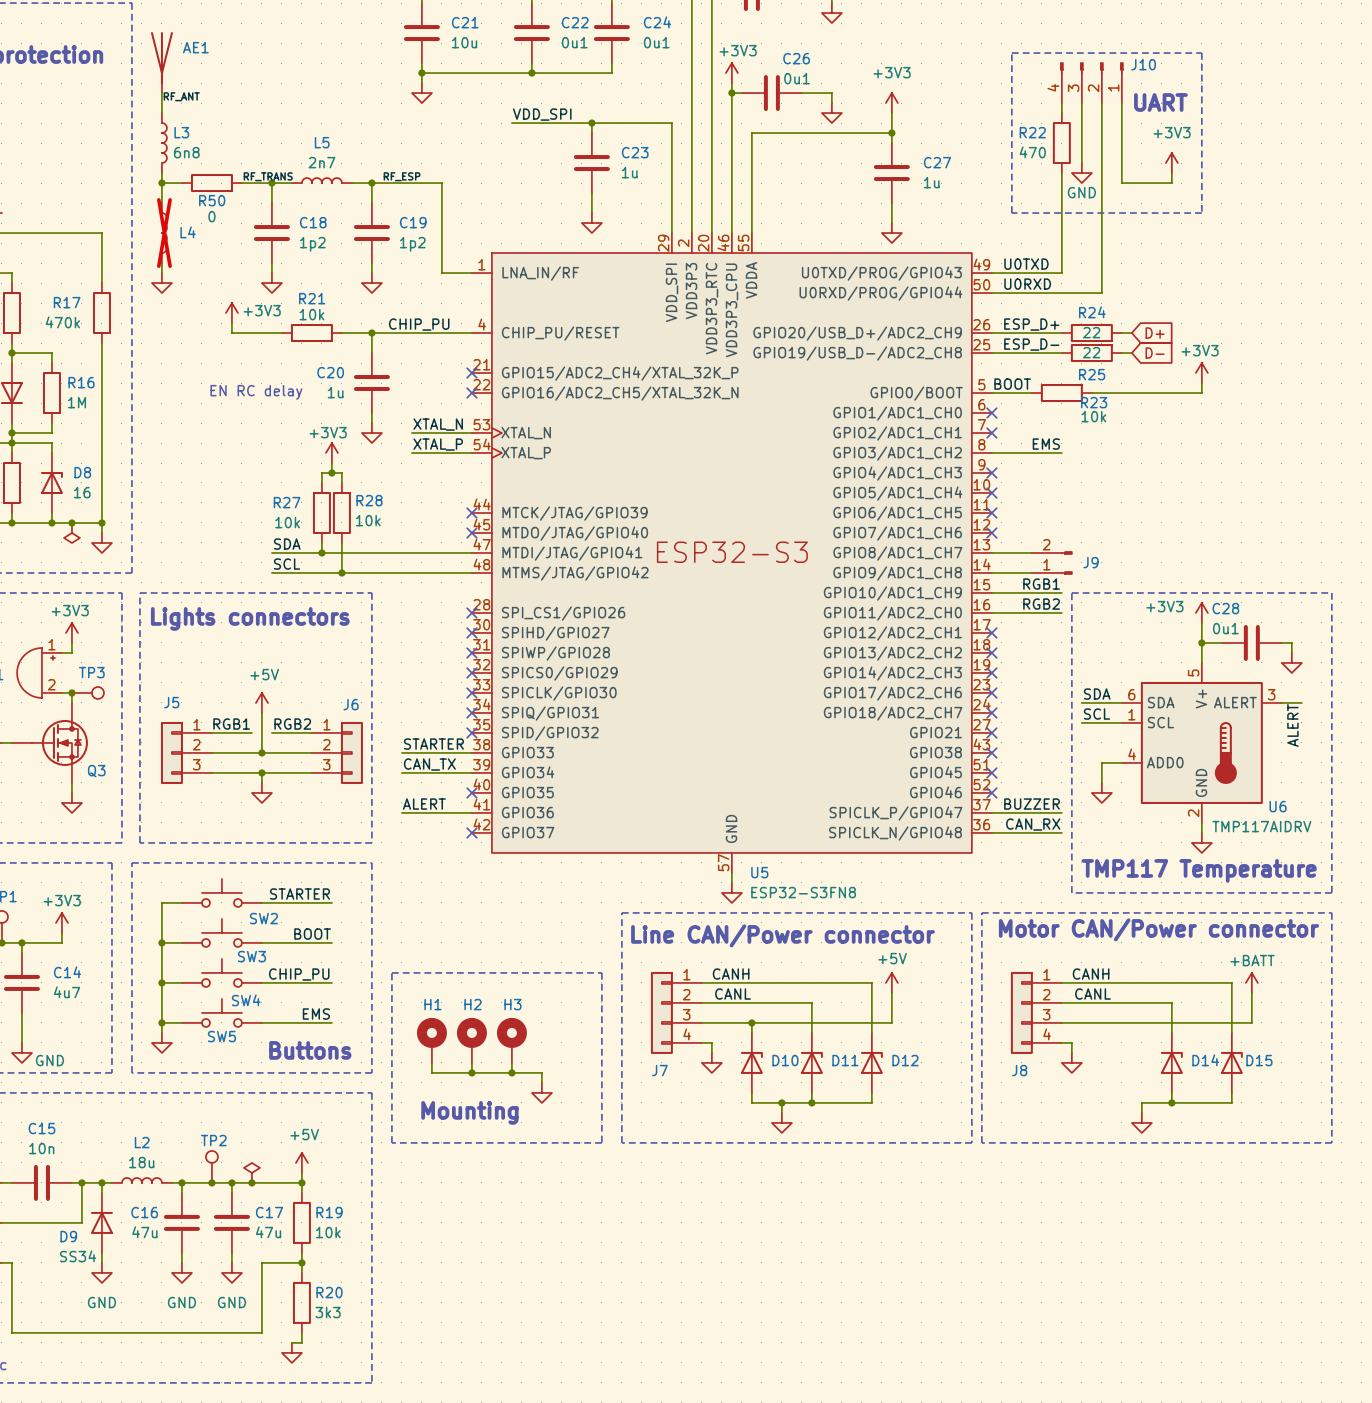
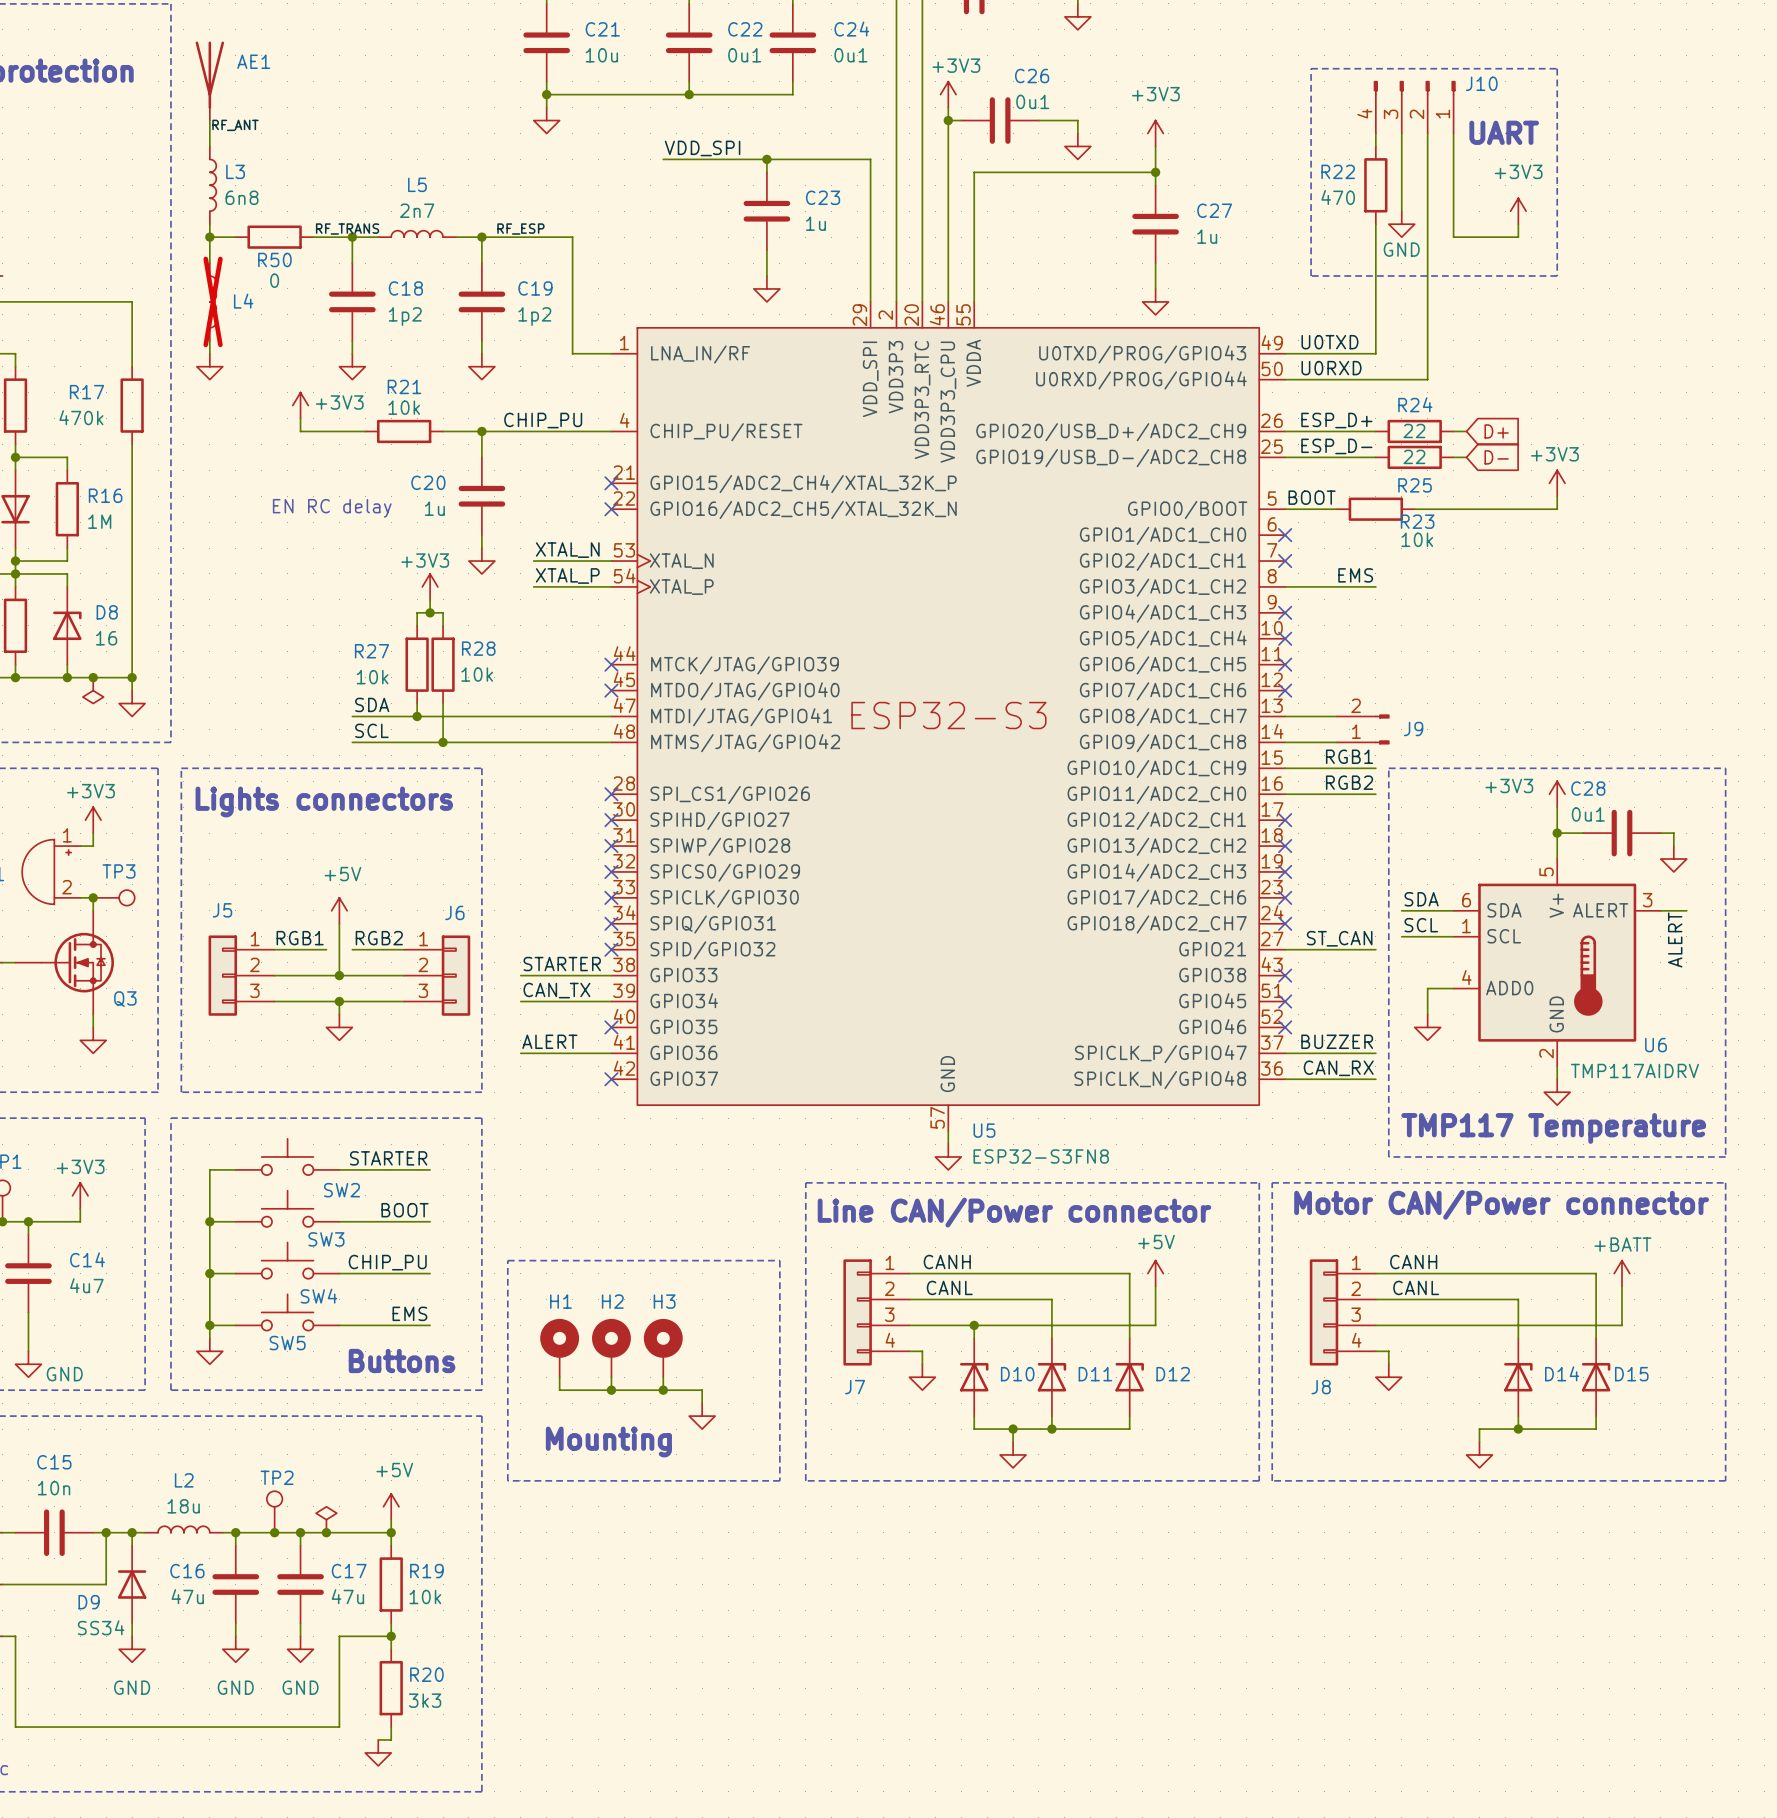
label: none -> ST_CAN (1339, 938)
wire: none -> (1285, 949) (1375, 949)
no-connect mark: (991, 732) -> none

